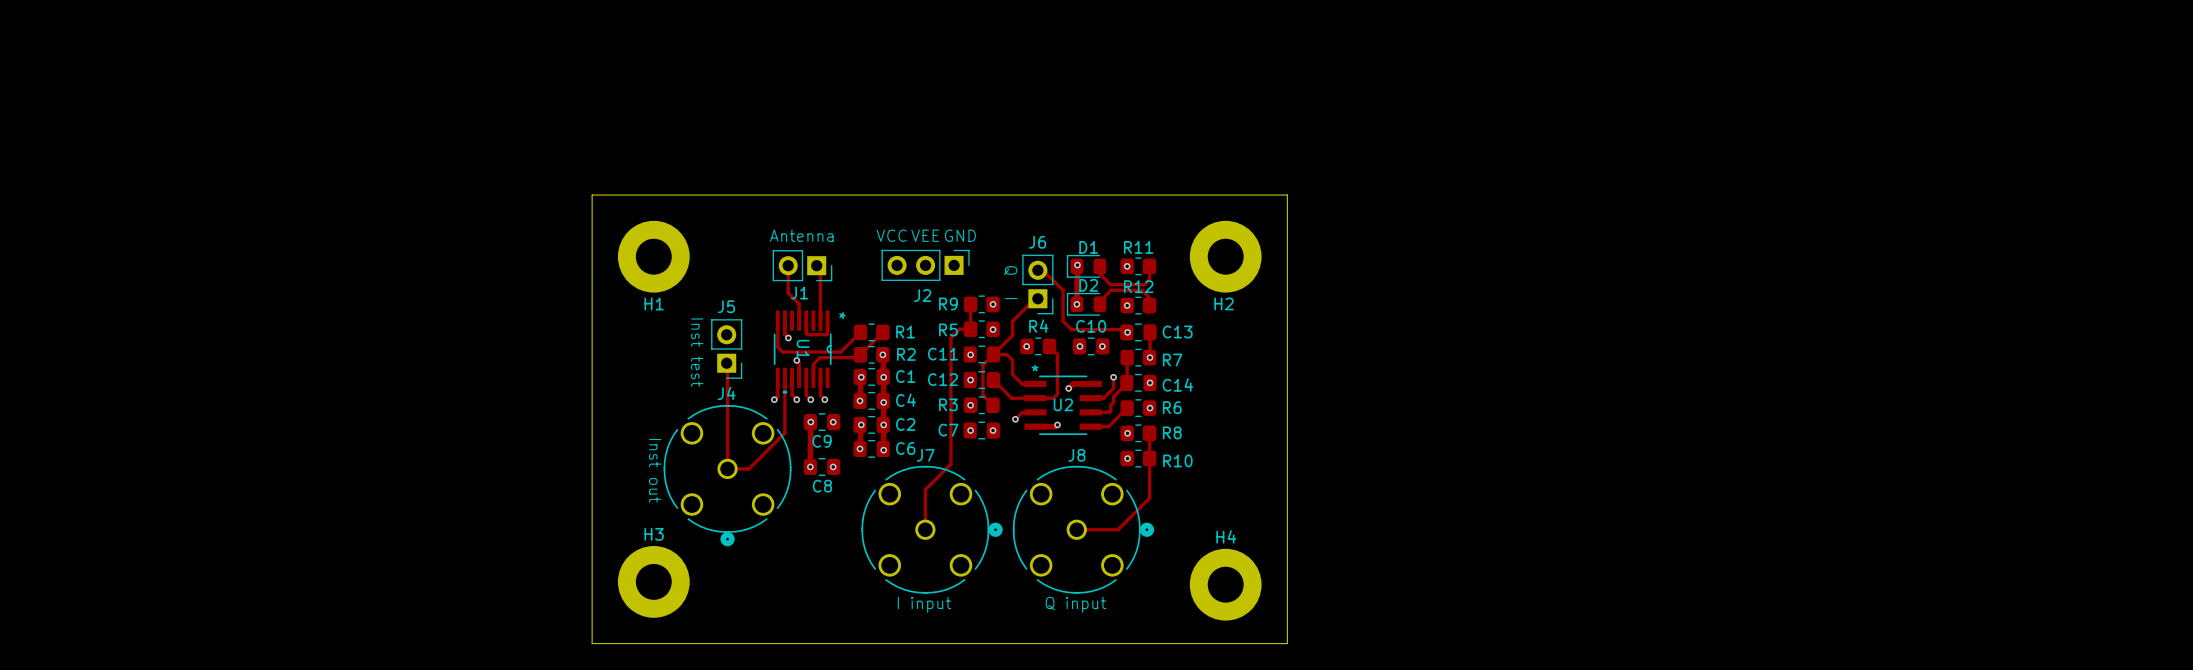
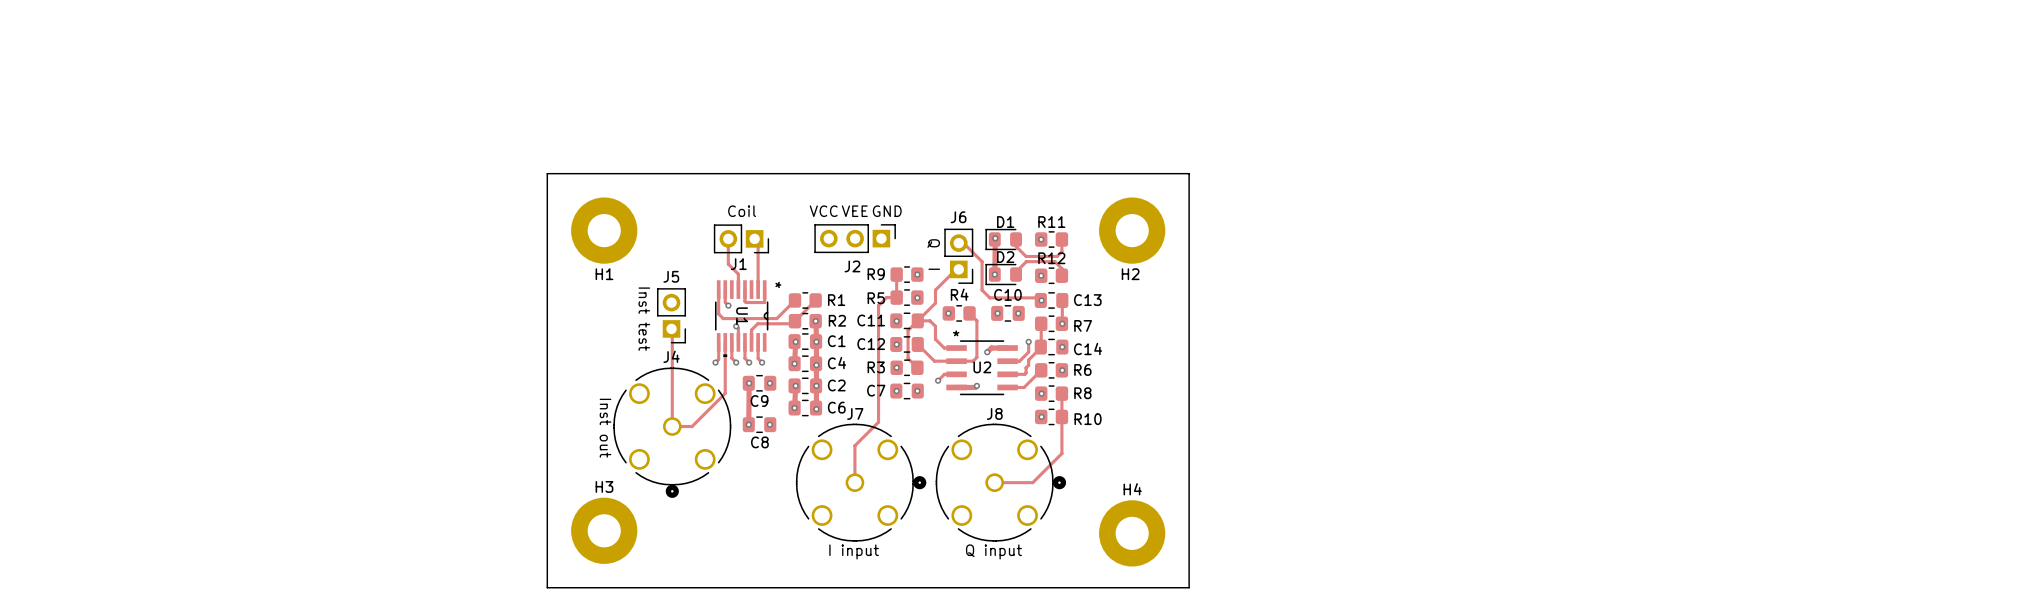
text: Antenna (801, 235) -> none
text: none -> Coil (742, 211)

